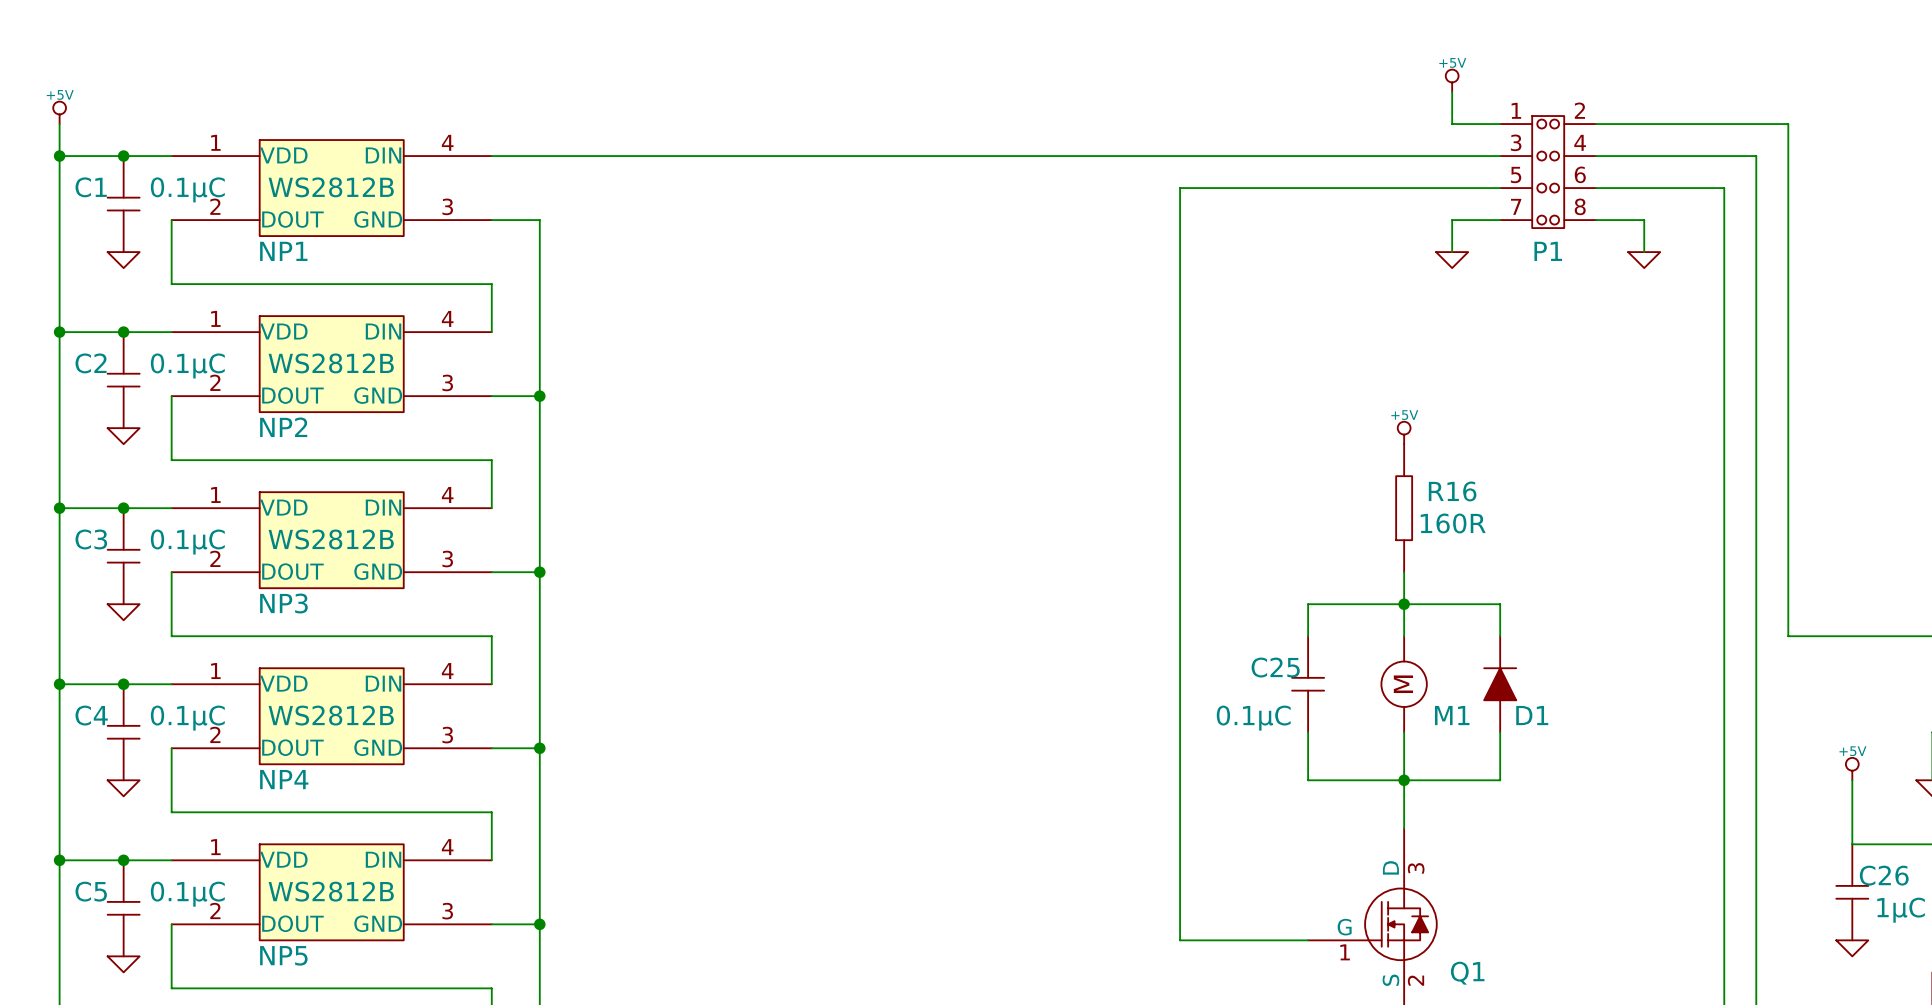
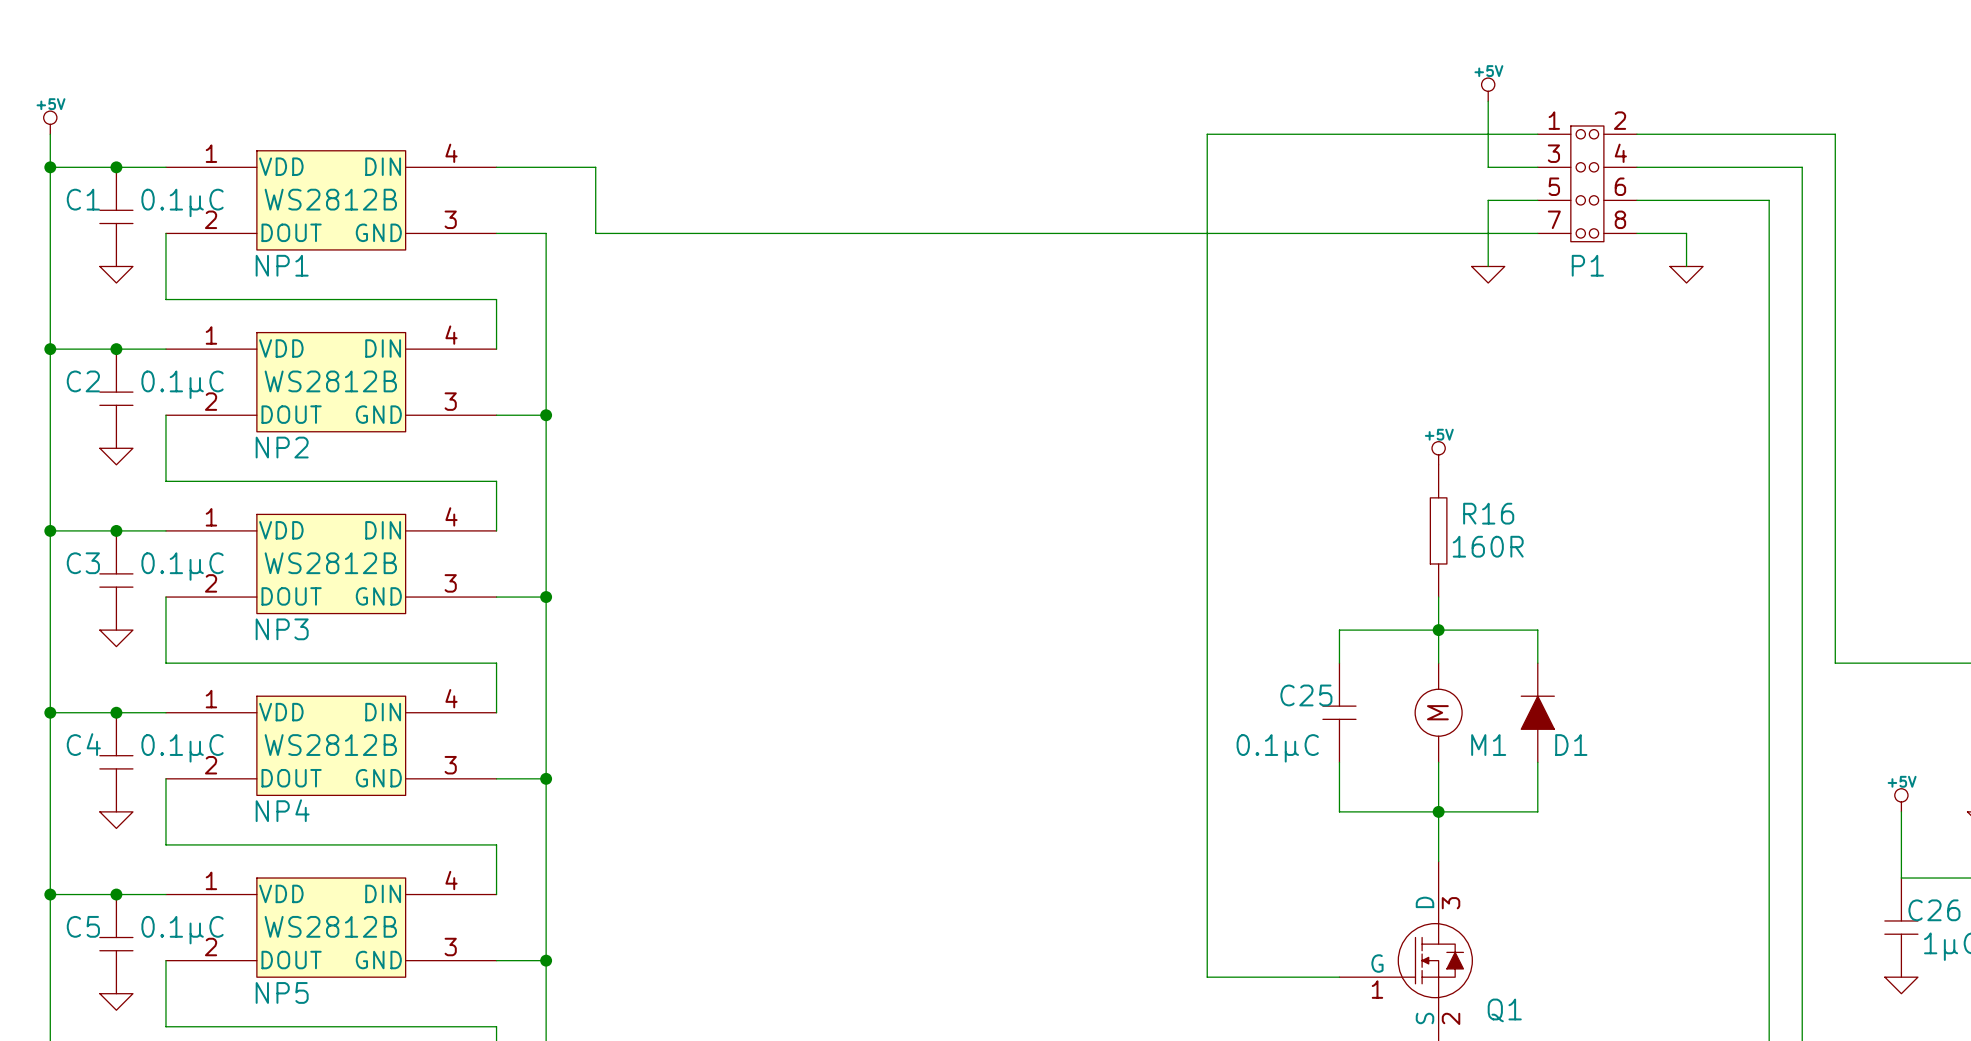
wire: (587, 156) (1452, 156) -> (595, 167) (595, 233) (1488, 233) (1488, 200)
wire: (1180, 188) (1452, 188) -> (1207, 200) (1207, 134) (1488, 134) (1488, 167)

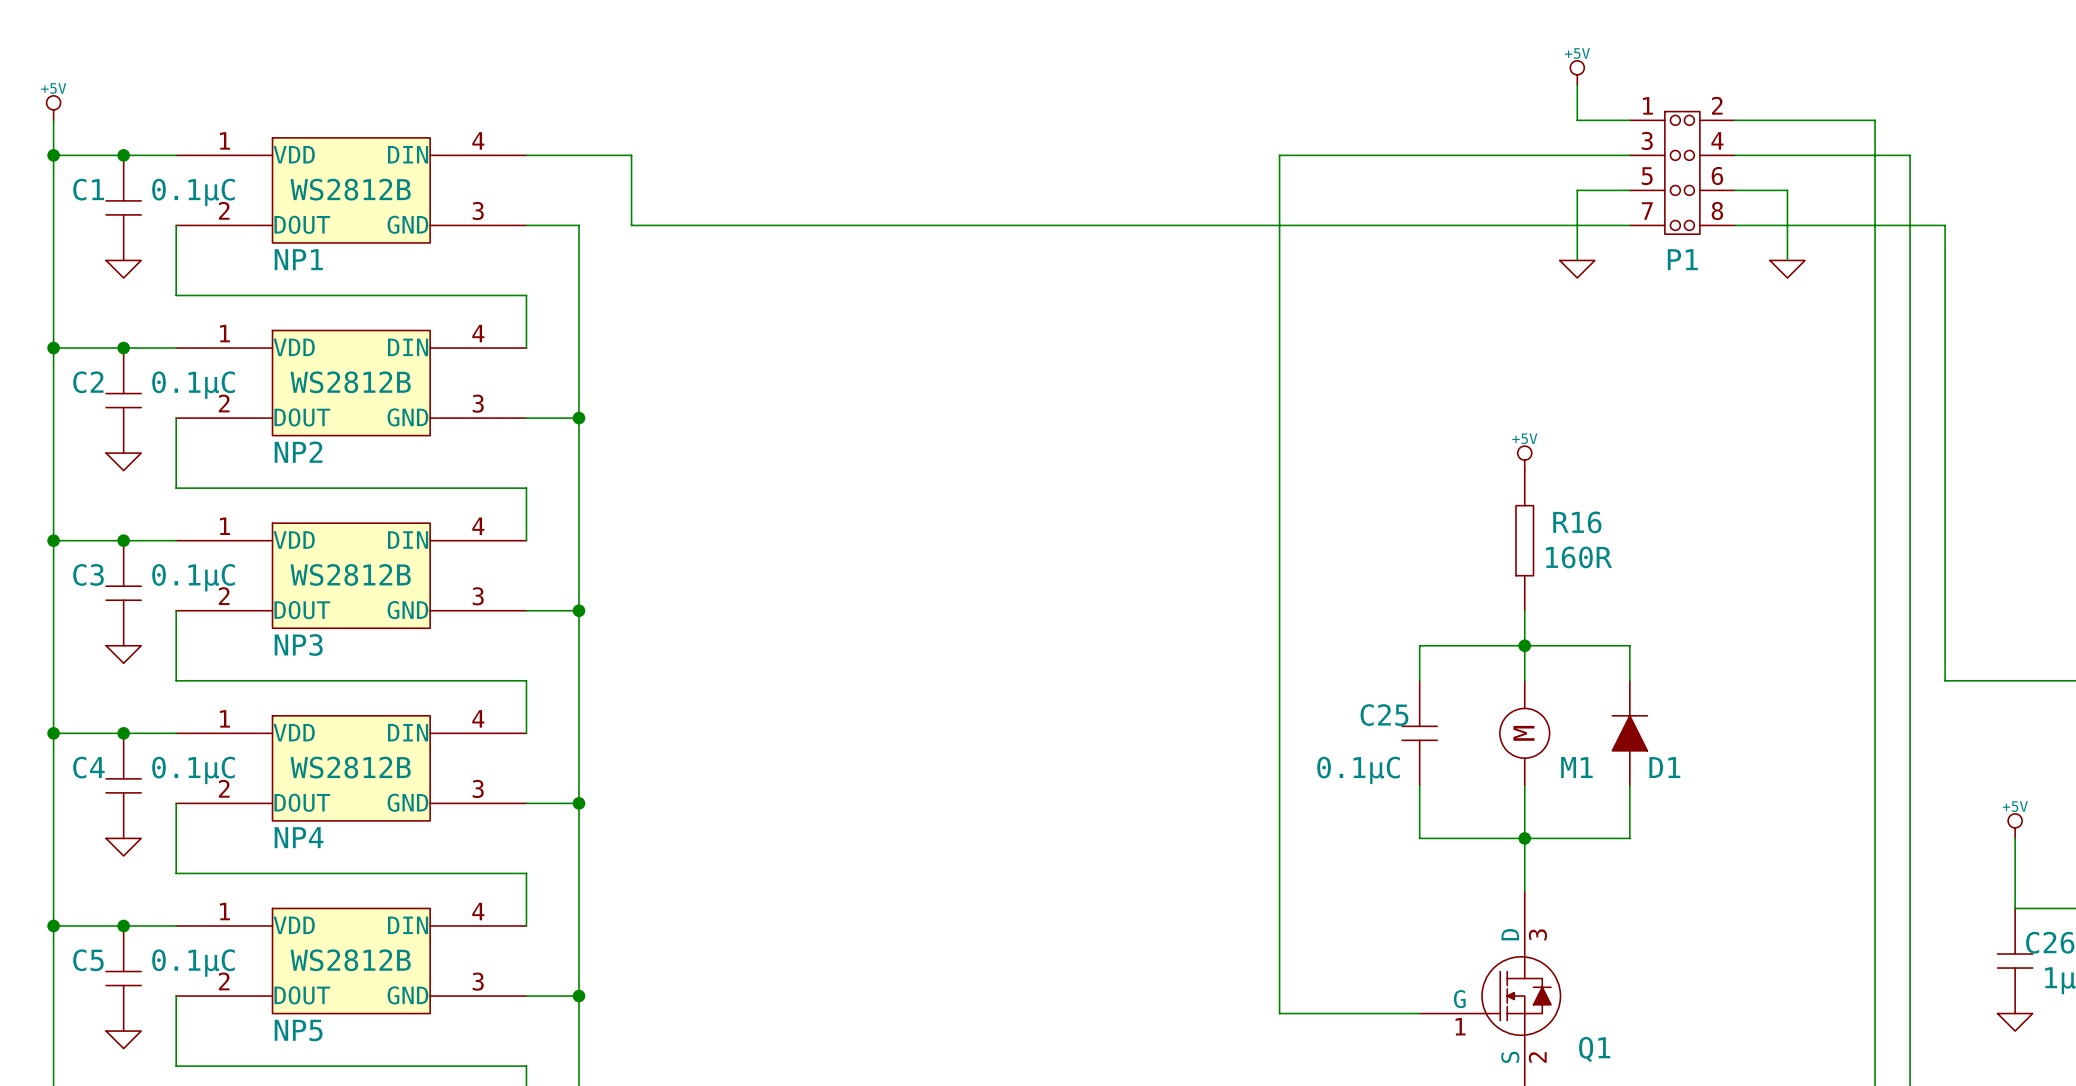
wire: (1769, 134) (1835, 134) (1835, 233) -> (1875, 120) (1875, 190)
wire: (1207, 167) (1207, 134) (1488, 134) (1488, 167) -> (1279, 155) (1577, 155)
wire: (1686, 200) (1769, 200) -> (1787, 190) (1787, 225) (1945, 225)

